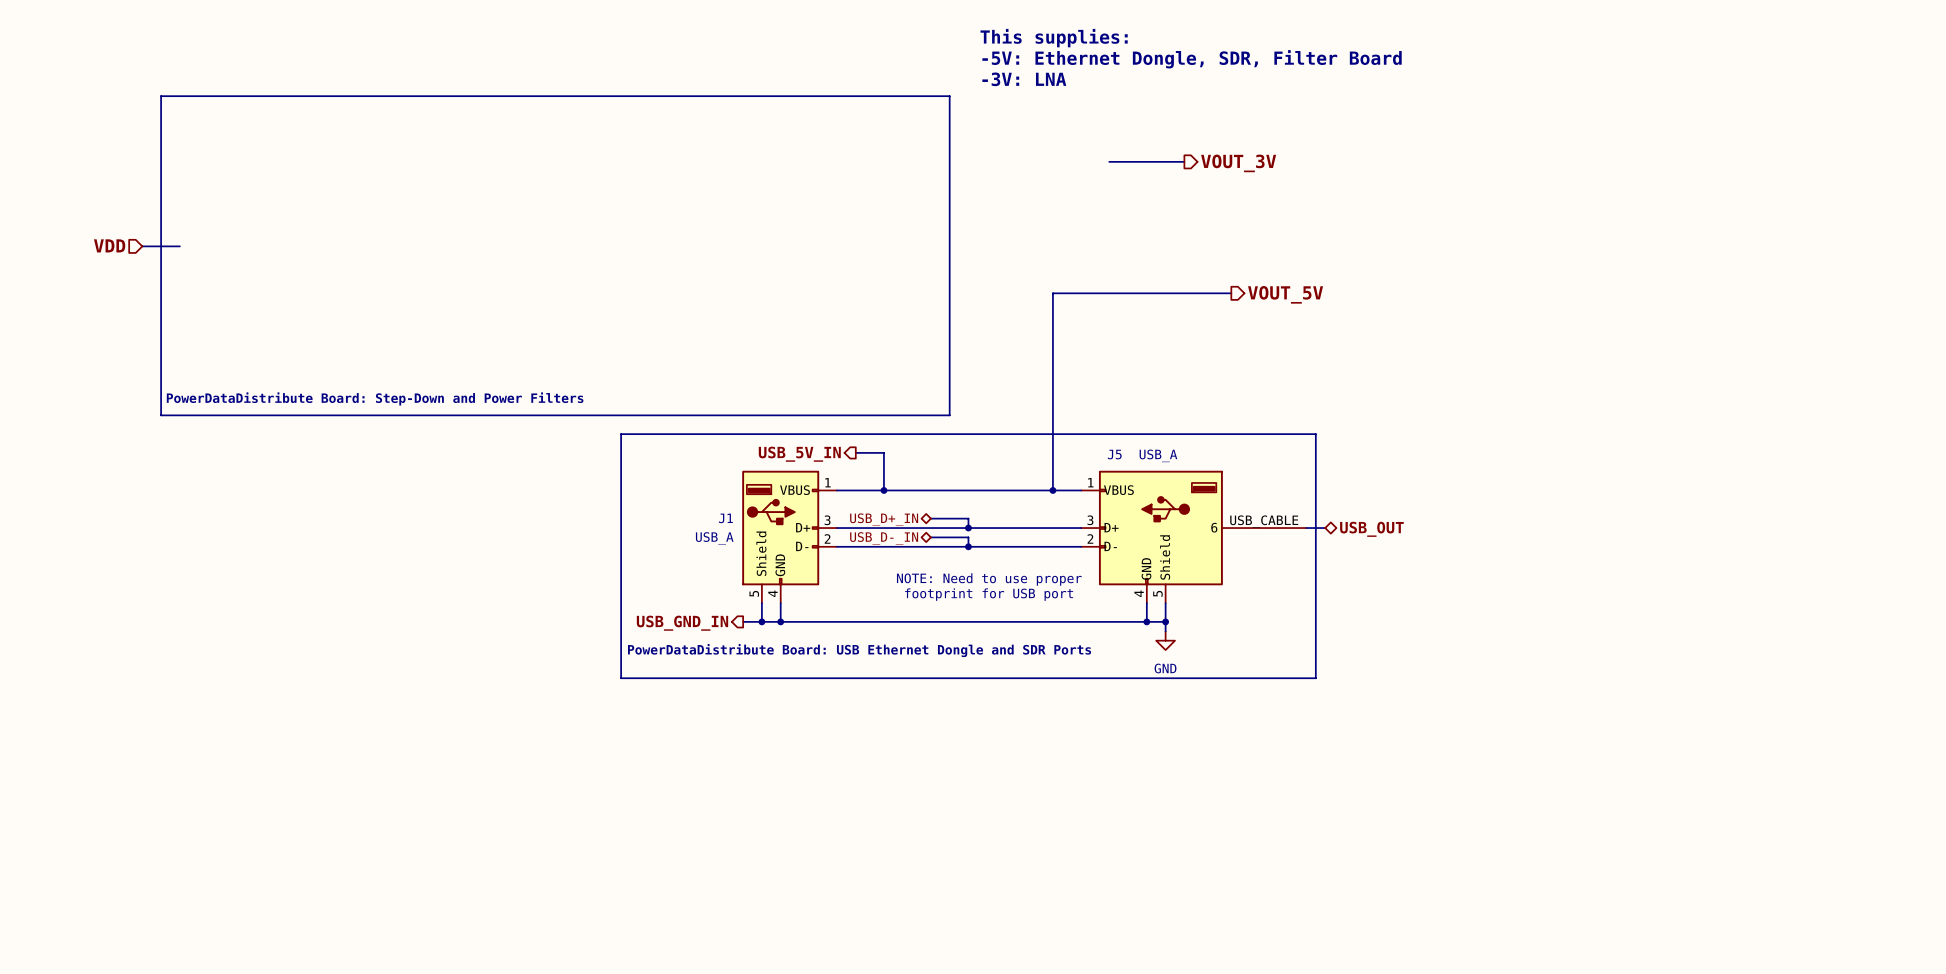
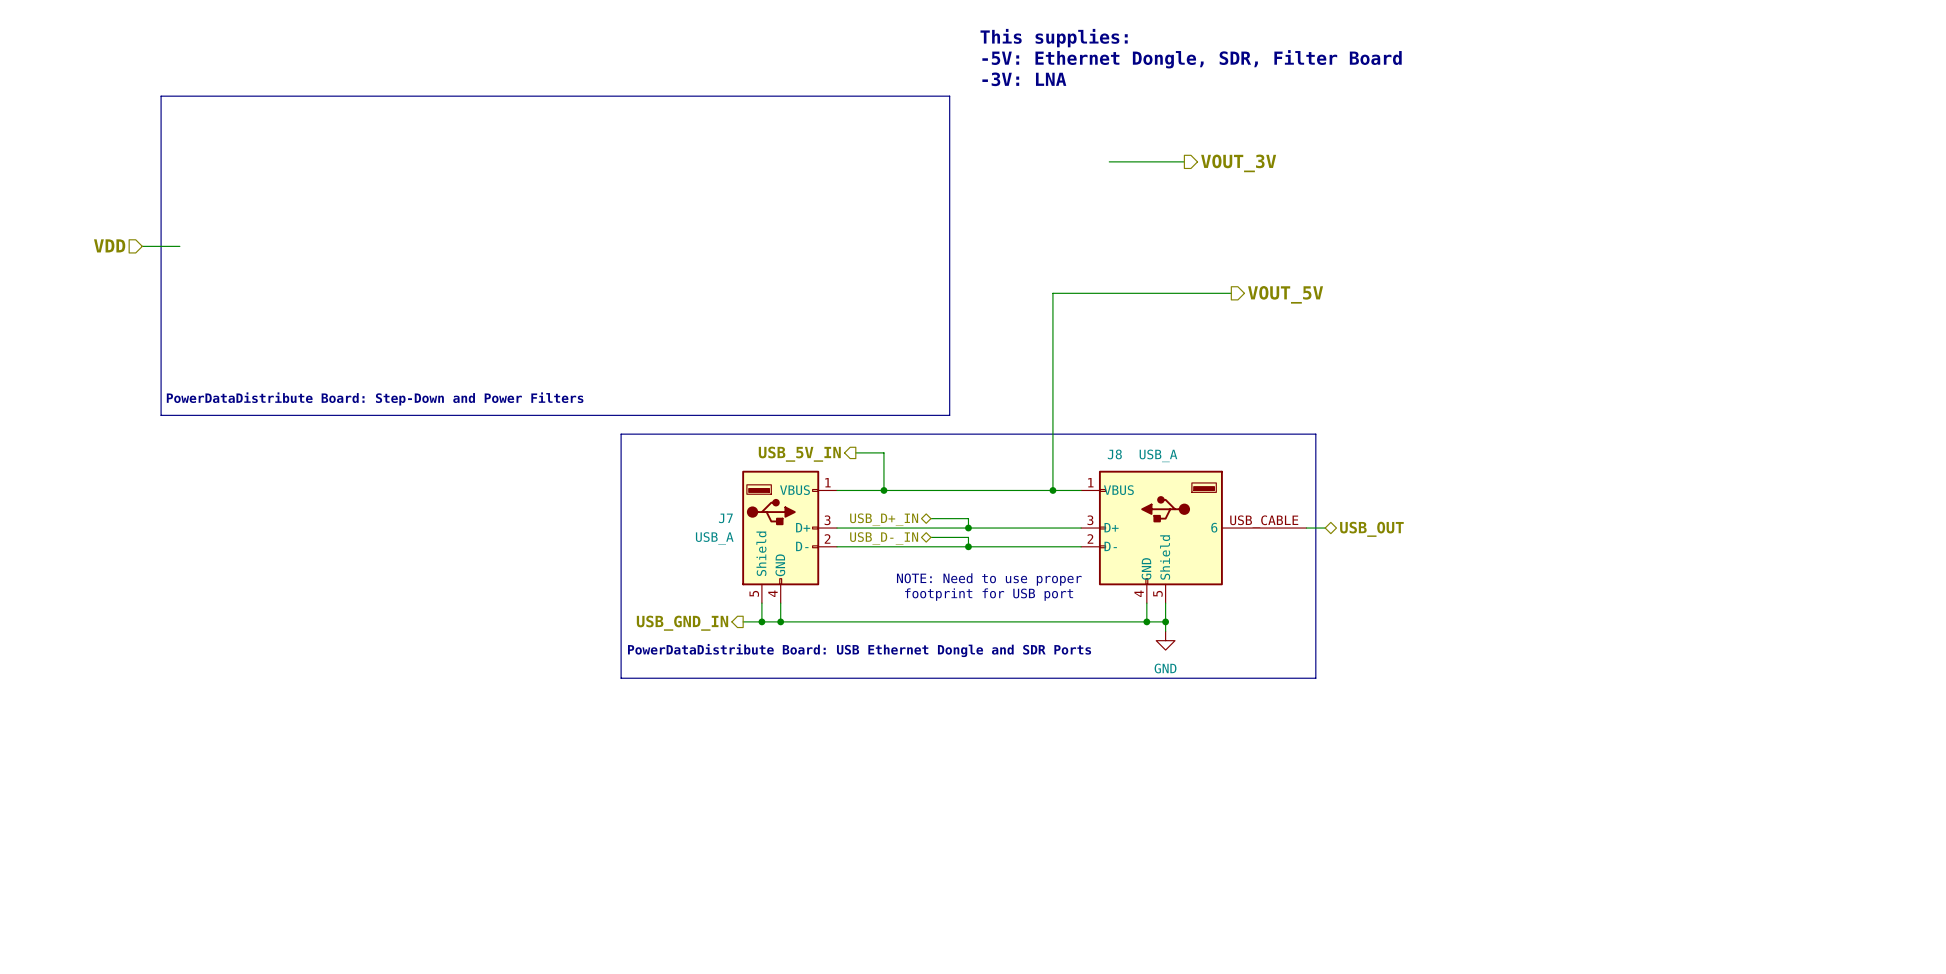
J5 name: J5 (1114, 454) -> J8 (1114, 454)
J1 name: J1 (725, 518) -> J7 (725, 518)

